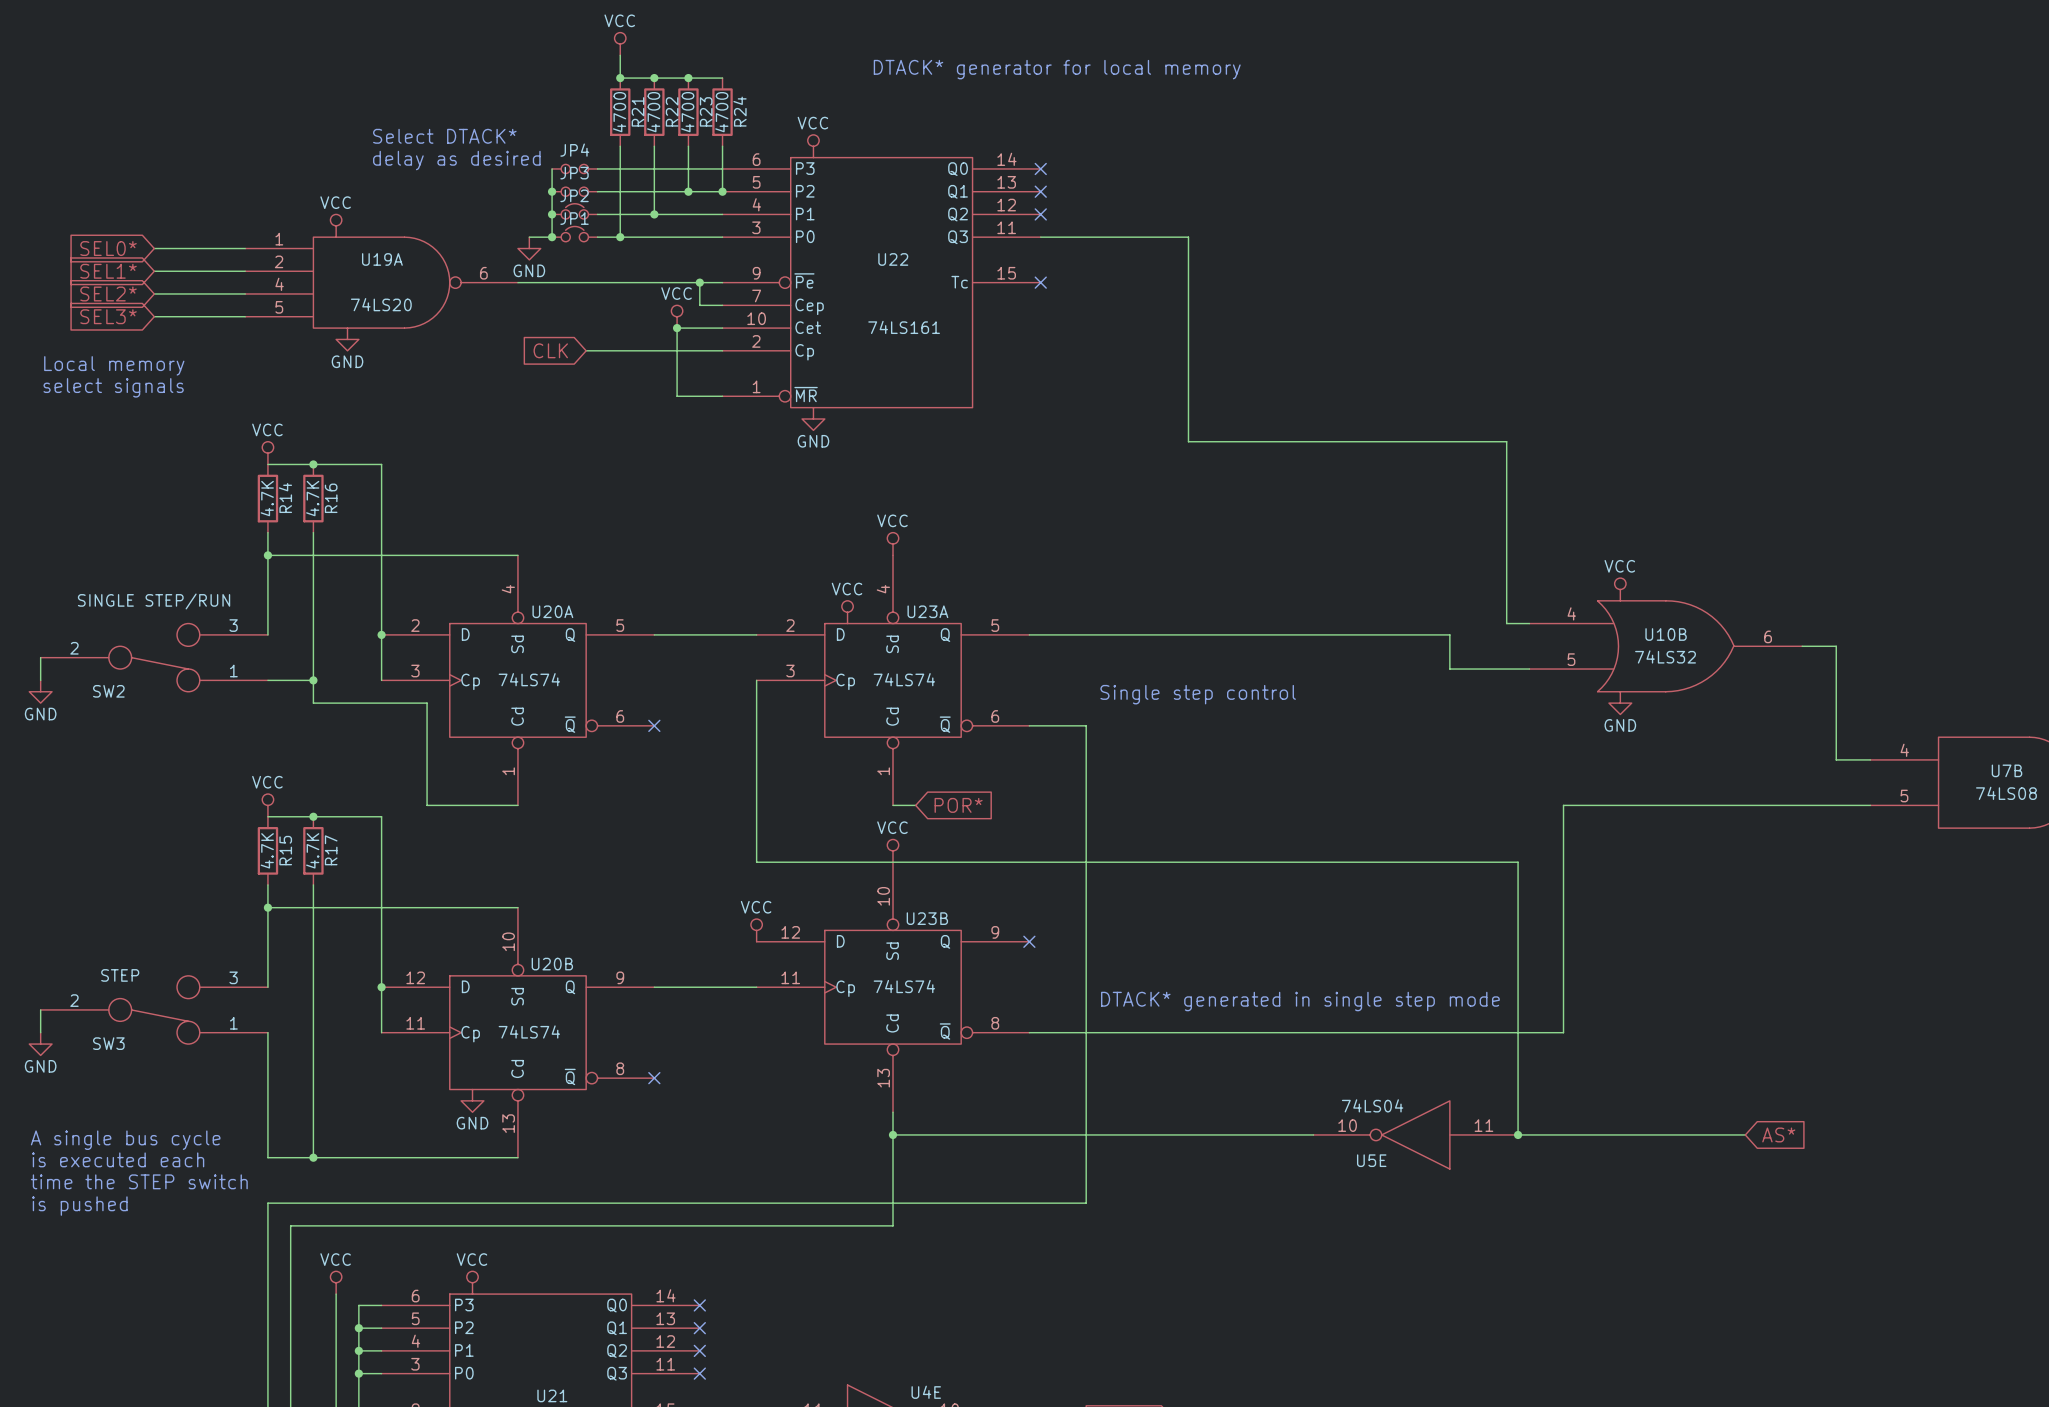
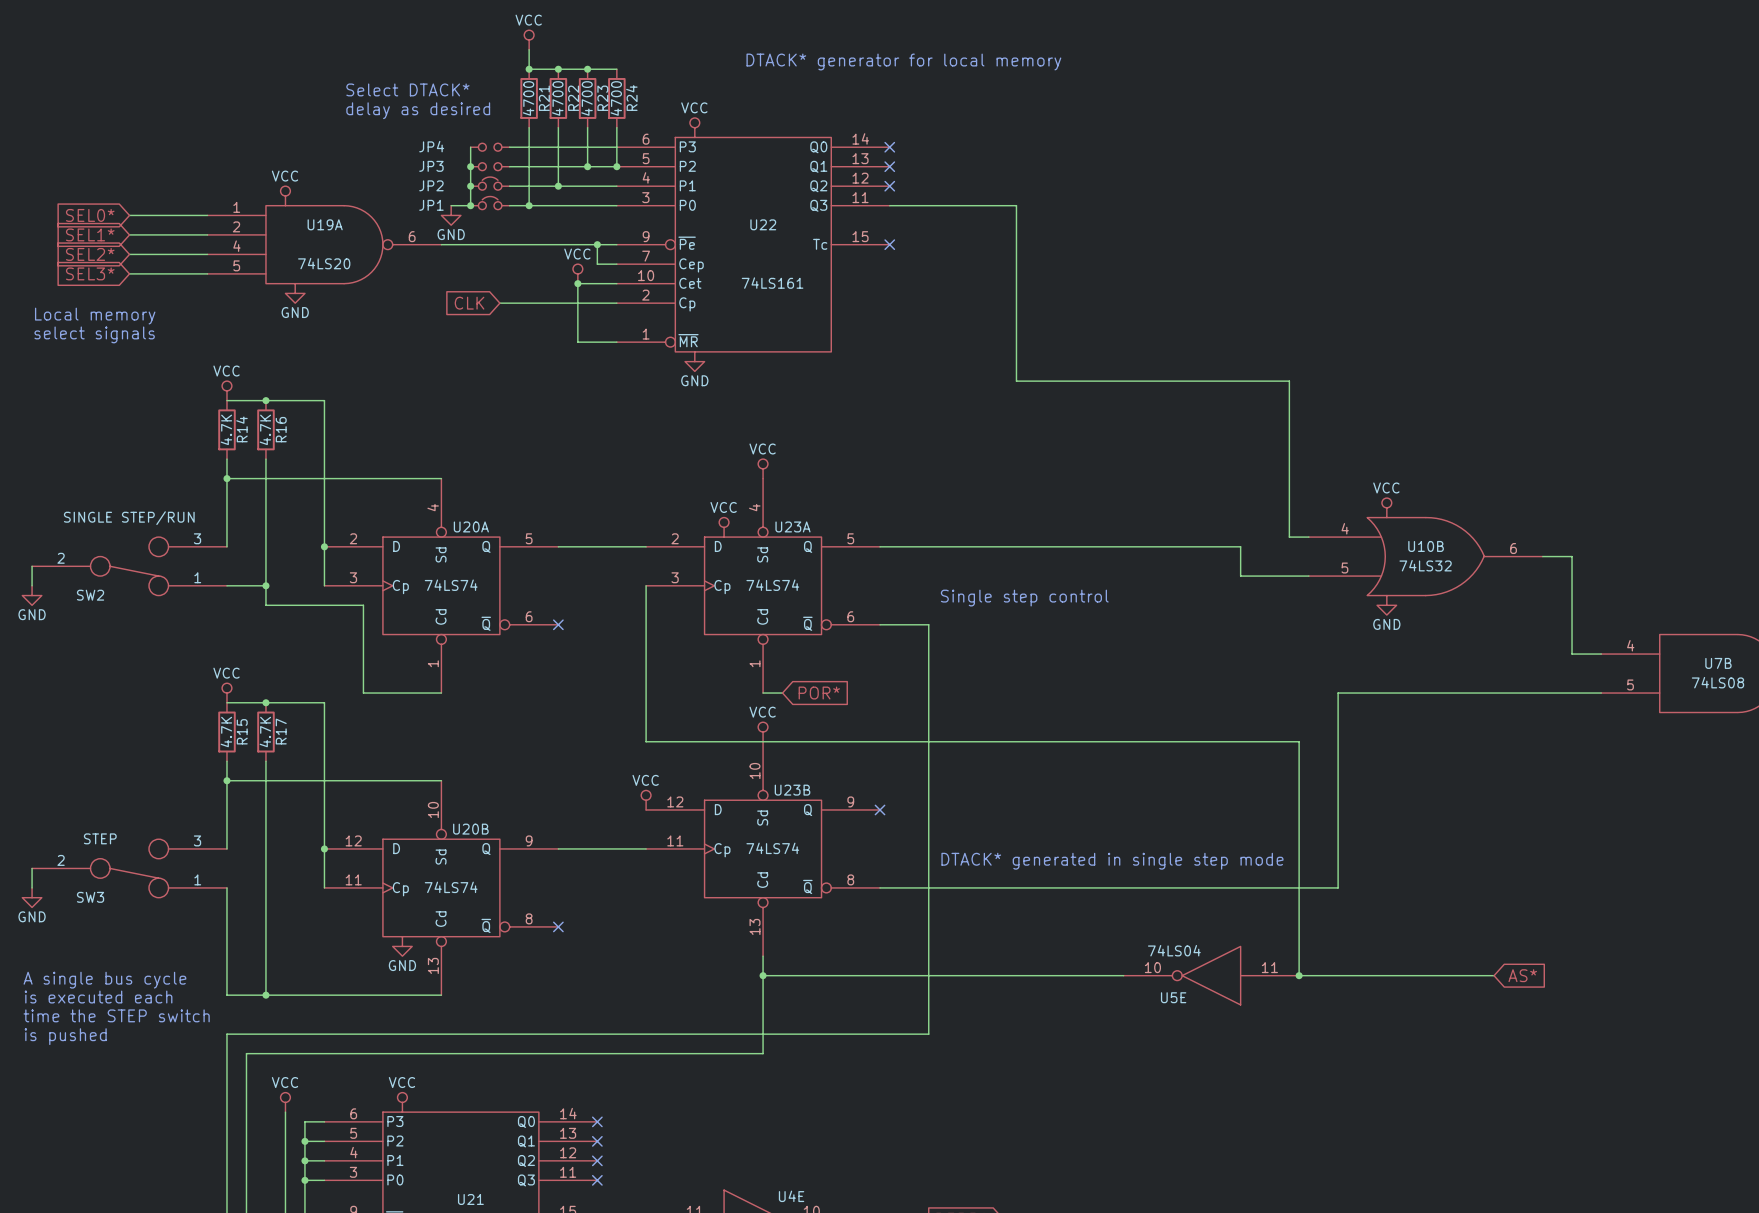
text position: Select DTACK* (444, 136) -> Select DTACK* (407, 89)
JP4 name position: JP4 (574, 150) -> JP4 (431, 146)
text position: delay as desired (456, 160) -> delay as desired (418, 110)
JP3 name position: JP3 (574, 173) -> JP3 (431, 166)
JP2 name position: JP2 (574, 195) -> JP2 (431, 185)
JP1 name position: JP1 (574, 218) -> JP1 (431, 205)

